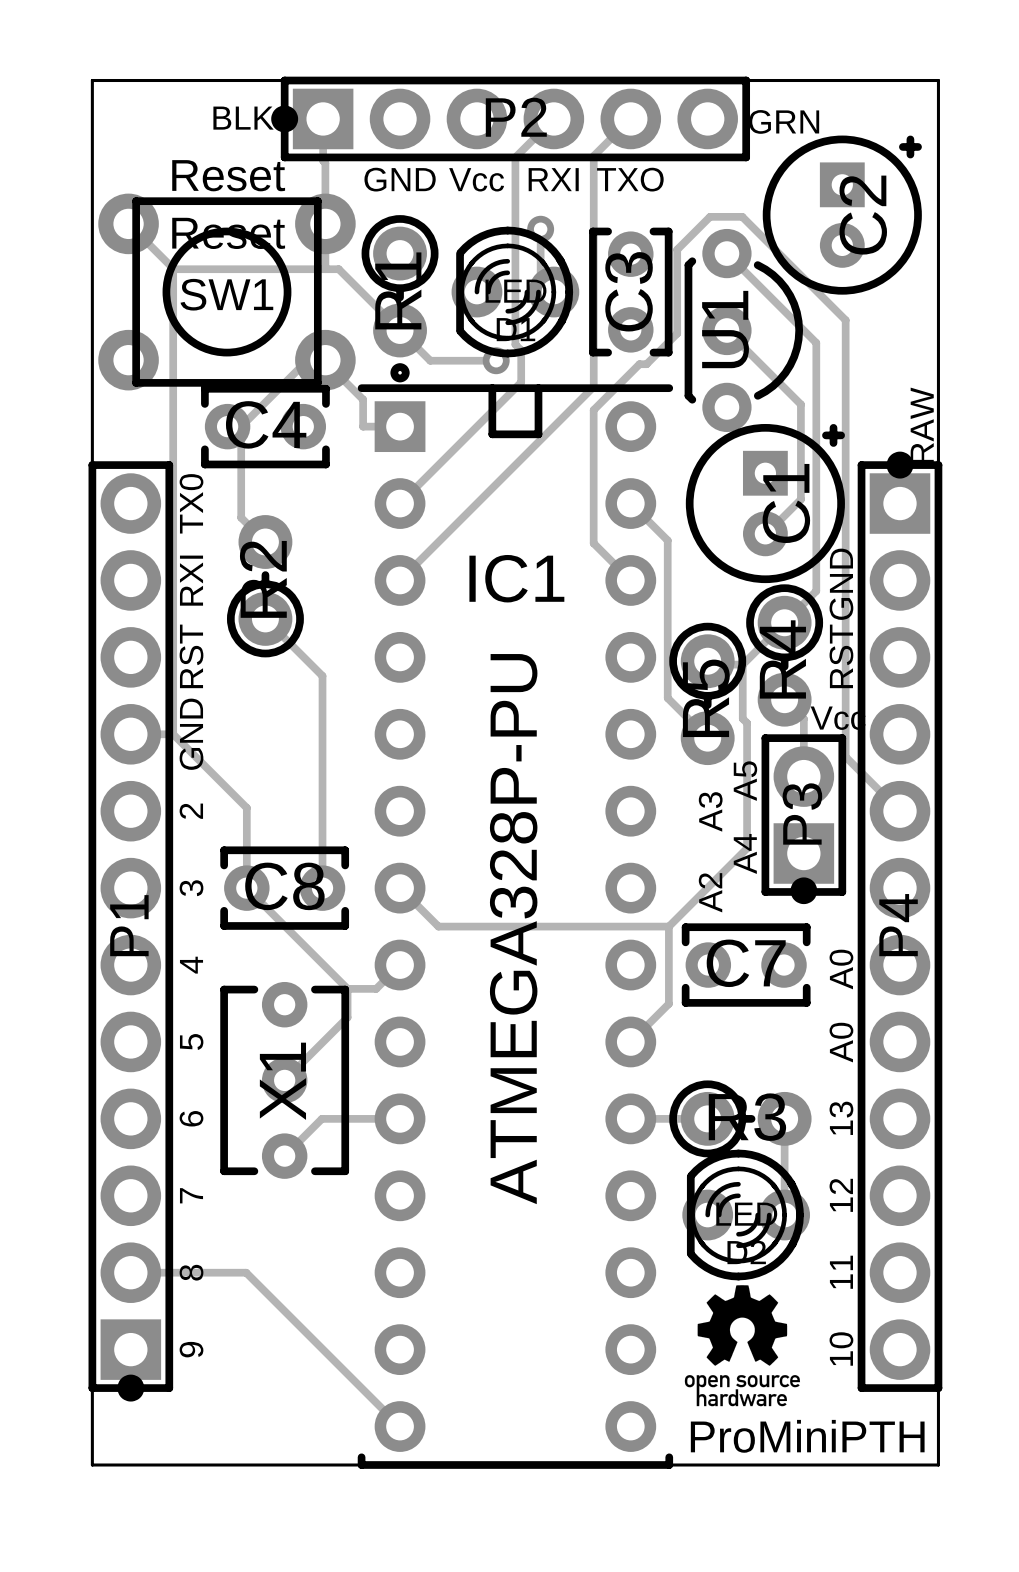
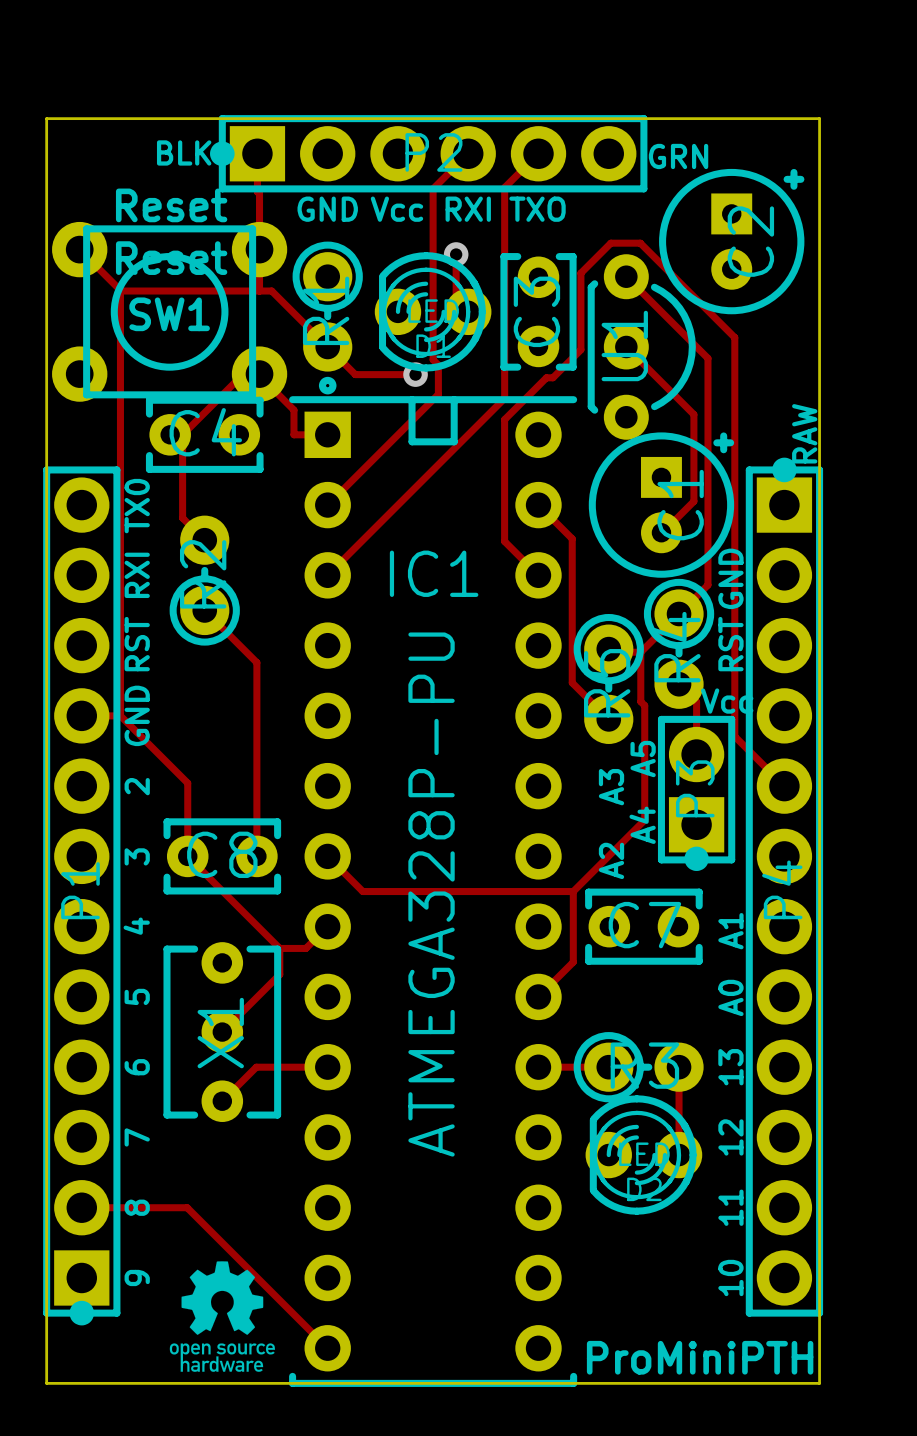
text: A0 (841, 969) -> A1 (730, 931)
drawing position: (742, 1345) -> (222, 1316)

